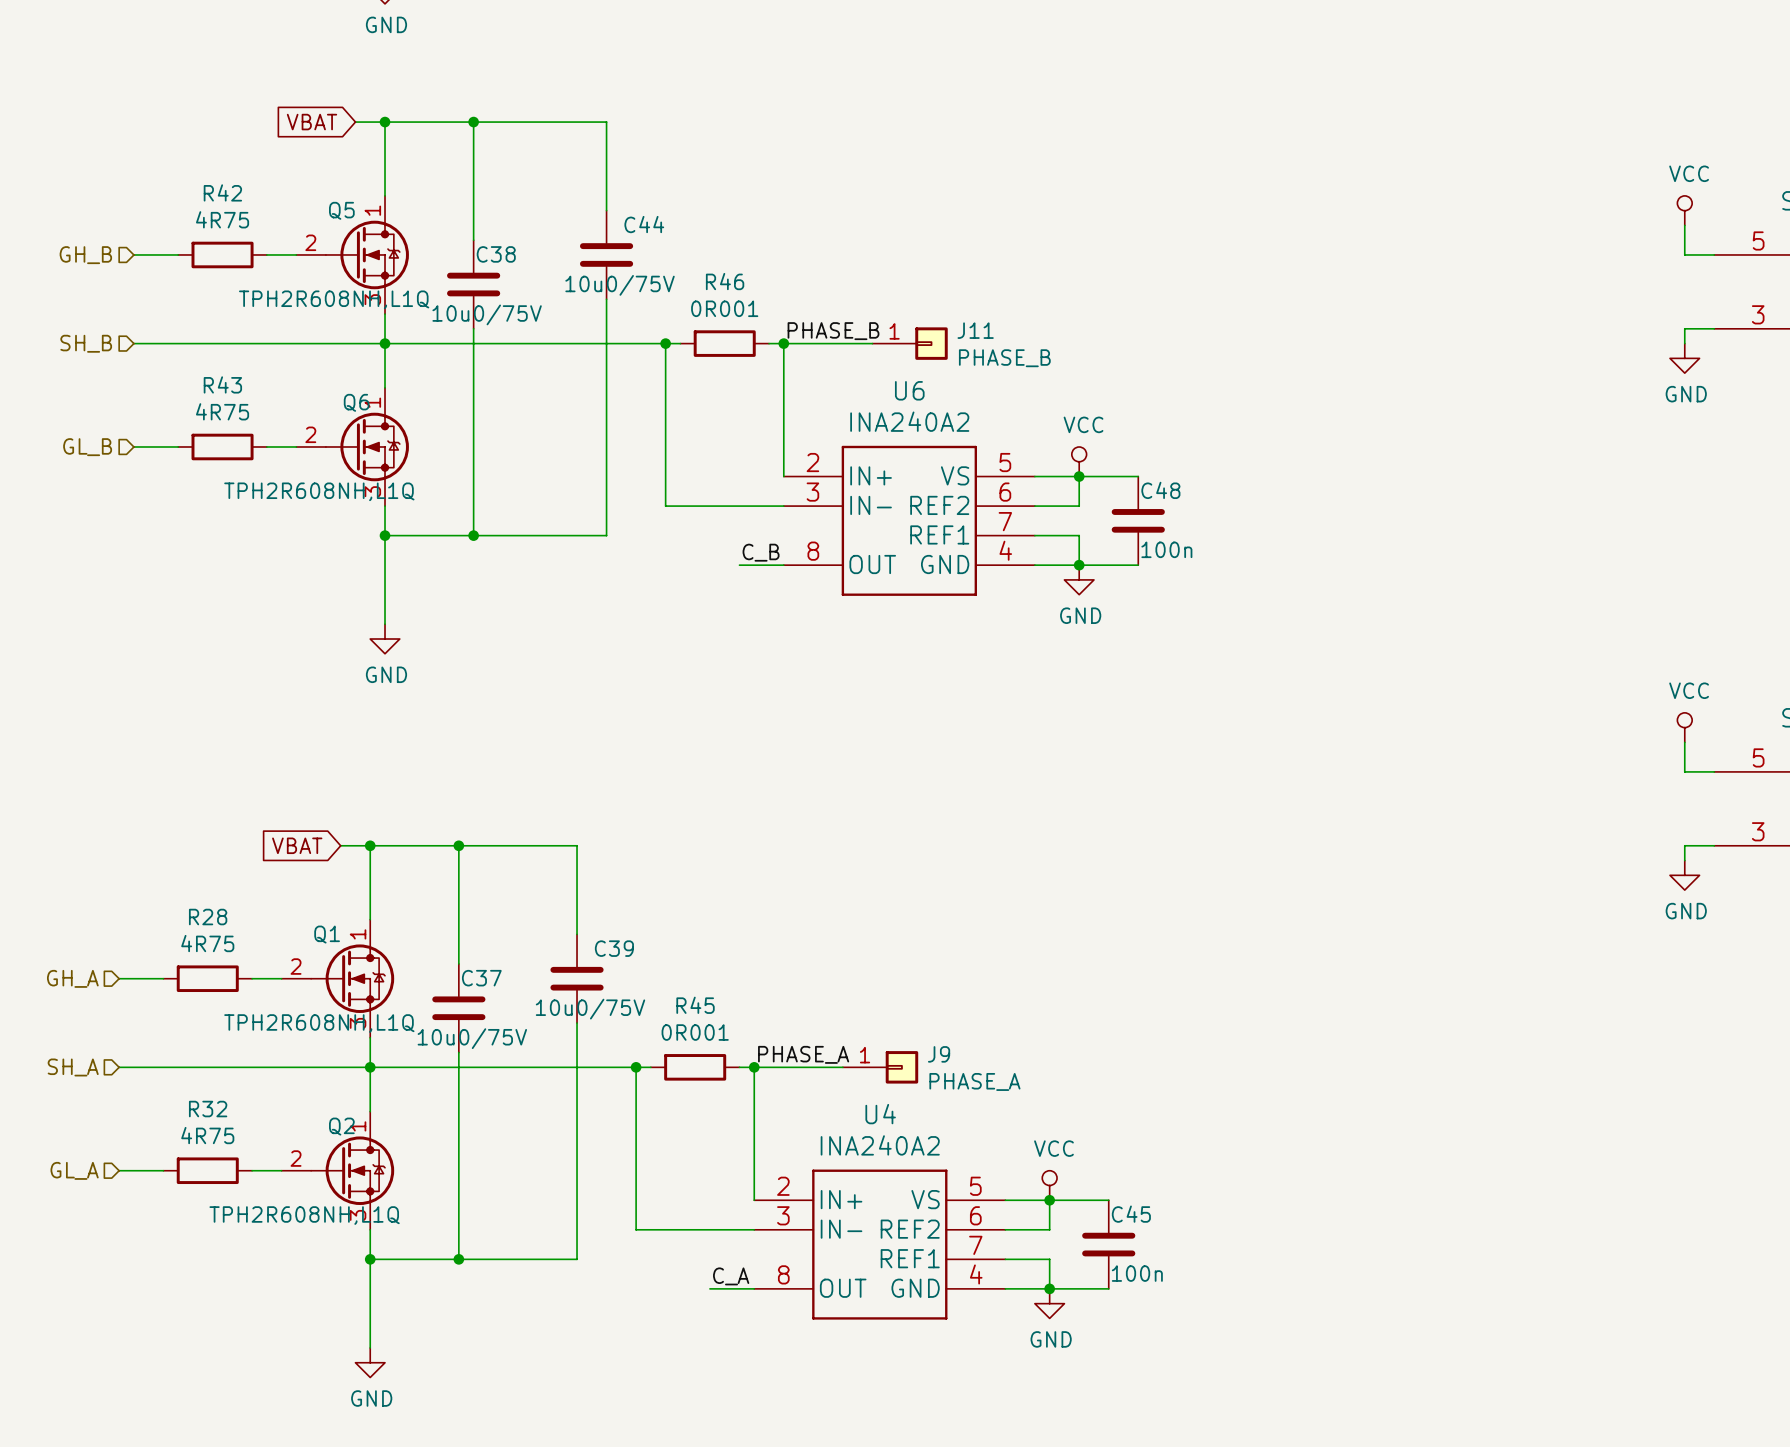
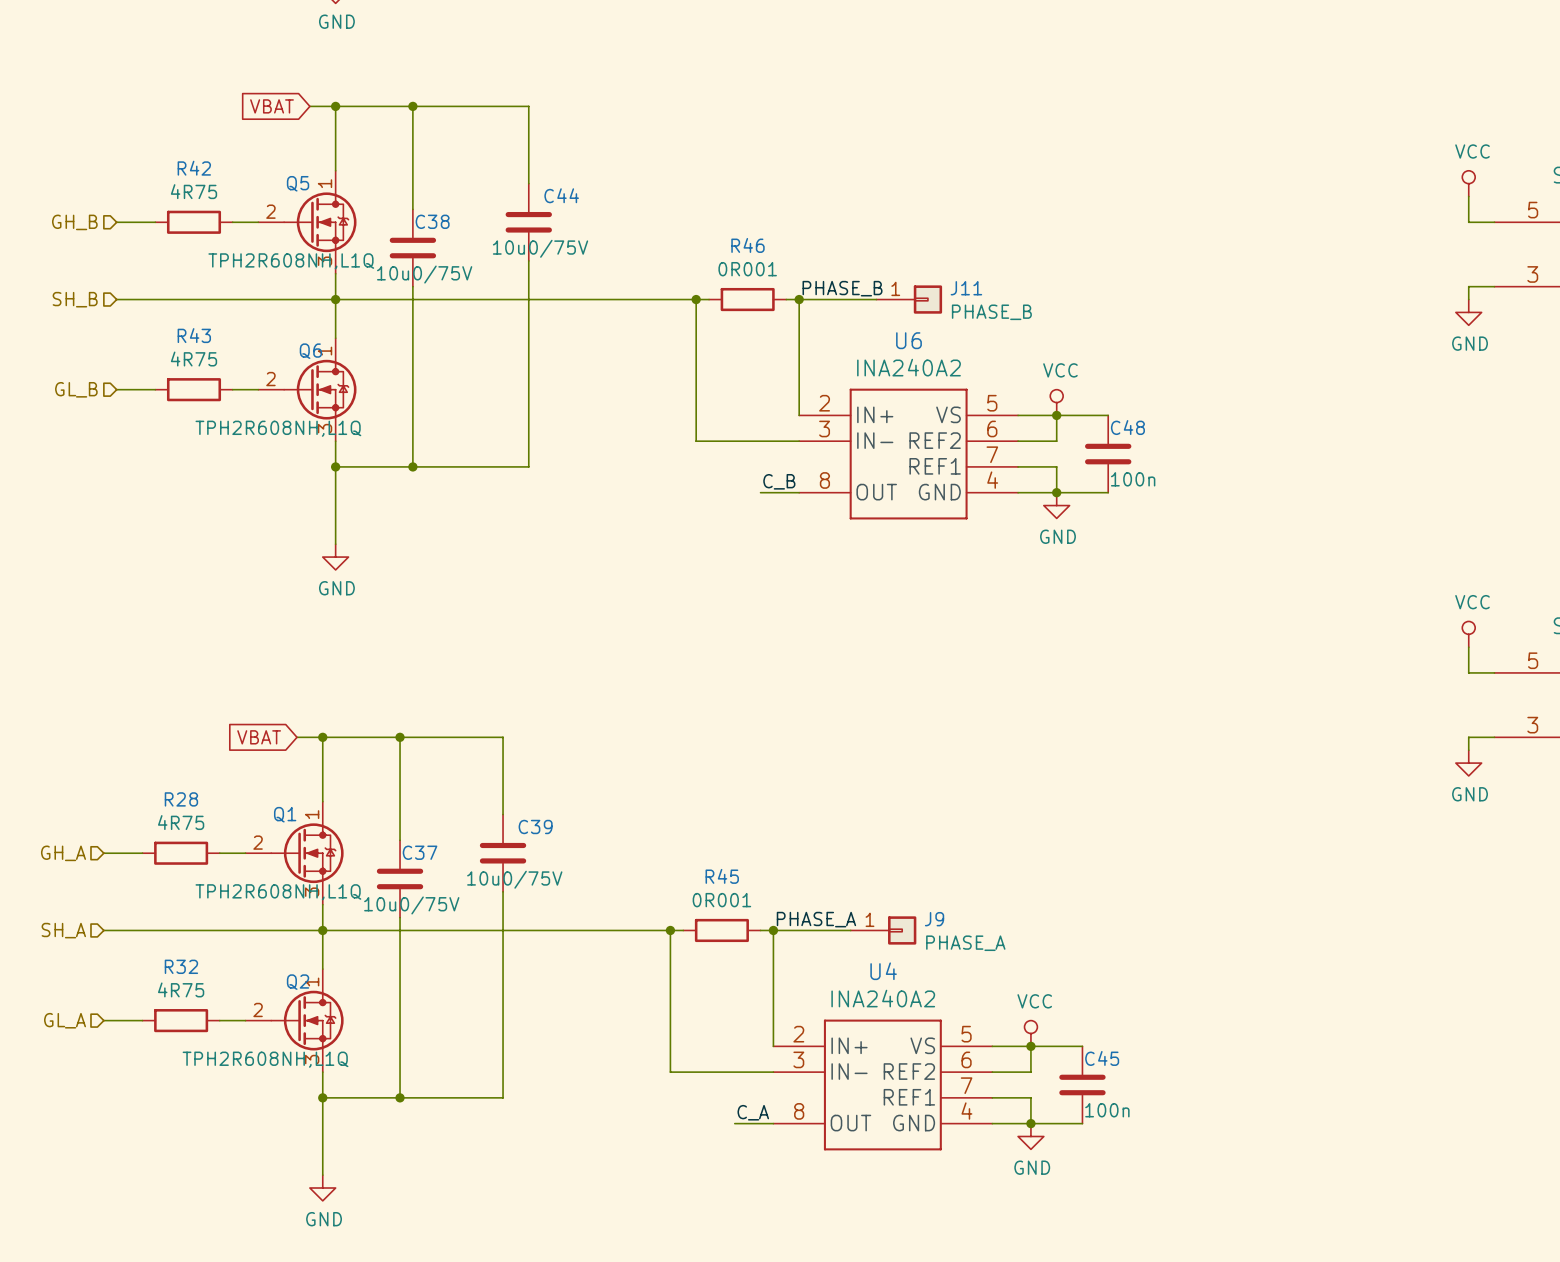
label position: PHASE_B (833, 331) -> PHASE_B (842, 288)
wire: (665, 343) (665, 506) (783, 506) -> (696, 299) (696, 441) (799, 441)
junction: (665, 343) -> none
wire: none -> (593, 299) (670, 299)
R46 position: (724, 343) -> (747, 299)
wire: (783, 343) (783, 476) -> (799, 299) (799, 415)
junction position: (783, 343) -> (696, 299)
wire: (813, 343) (872, 343) -> none
wire: none -> (786, 299) (876, 299)
J11 position: (910, 343) -> (909, 299)
junction: none -> (799, 299)
power symbol position: VCC (1079, 461) -> VCC (1056, 402)
wire: (1034, 476) (1138, 476) -> (1018, 415) (1108, 415)
wire: (1079, 476) (1079, 506) (1034, 506) -> (1056, 415) (1056, 441) (1018, 441)
junction: (1079, 476) -> none
junction: none -> (1056, 415)
U6 position: (909, 520) -> (908, 454)
C48 position: (1138, 520) -> (1108, 454)
wire: (1034, 535) (1079, 535) (1079, 565) -> (1018, 466) (1056, 466) (1056, 492)
label position: C_B (761, 552) -> C_B (779, 481)
wire: (739, 565) (783, 565) -> (760, 492) (799, 492)
wire: (1034, 565) (1138, 565) -> (1018, 492) (1108, 492)
junction: (1079, 565) -> none
junction: none -> (1056, 492)
power symbol position: GND (1079, 579) -> GND (1056, 505)
label position: PHASE_A (803, 1054) -> PHASE_A (816, 919)
wire: (636, 1067) (636, 1229) (754, 1229) -> (670, 930) (670, 1072) (773, 1072)
junction: (636, 1067) -> none
wire: none -> (567, 930) (644, 930)
R45 position: (695, 1067) -> (721, 930)
wire: (754, 1067) (754, 1200) -> (773, 930) (773, 1046)
junction position: (754, 1067) -> (670, 930)
wire: (783, 1067) (842, 1067) -> none
wire: none -> (760, 930) (850, 930)
J9 position: (880, 1067) -> (883, 930)
junction: none -> (773, 930)
power symbol position: VCC (1049, 1185) -> VCC (1030, 1033)
wire: (1005, 1200) (1108, 1200) -> (992, 1046) (1082, 1046)
wire: (1049, 1200) (1049, 1229) (1005, 1229) -> (1030, 1046) (1030, 1072) (992, 1072)
junction: (1049, 1200) -> none
junction: none -> (1030, 1046)
U4 position: (879, 1244) -> (882, 1084)
C45 position: (1108, 1244) -> (1082, 1084)
wire: (1005, 1259) (1049, 1259) (1049, 1288) -> (992, 1097) (1030, 1097) (1030, 1123)
label position: C_A (731, 1276) -> C_A (753, 1112)
wire: (709, 1288) (754, 1288) -> (734, 1123) (773, 1123)
wire: (1005, 1288) (1108, 1288) -> (992, 1123) (1082, 1123)
junction: (1049, 1288) -> none
junction: none -> (1030, 1123)
power symbol position: GND (1049, 1303) -> GND (1030, 1136)

